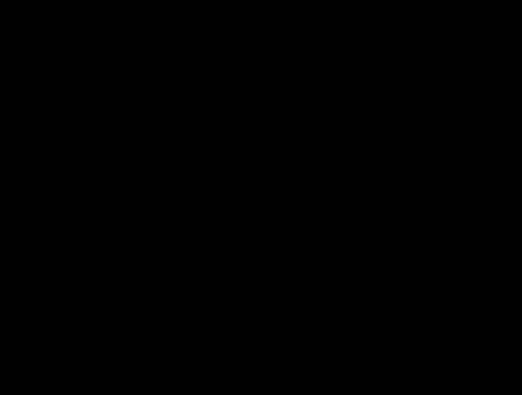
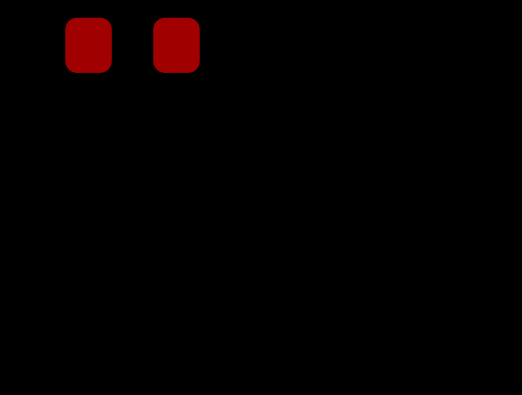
part: none -> (132, 45)

